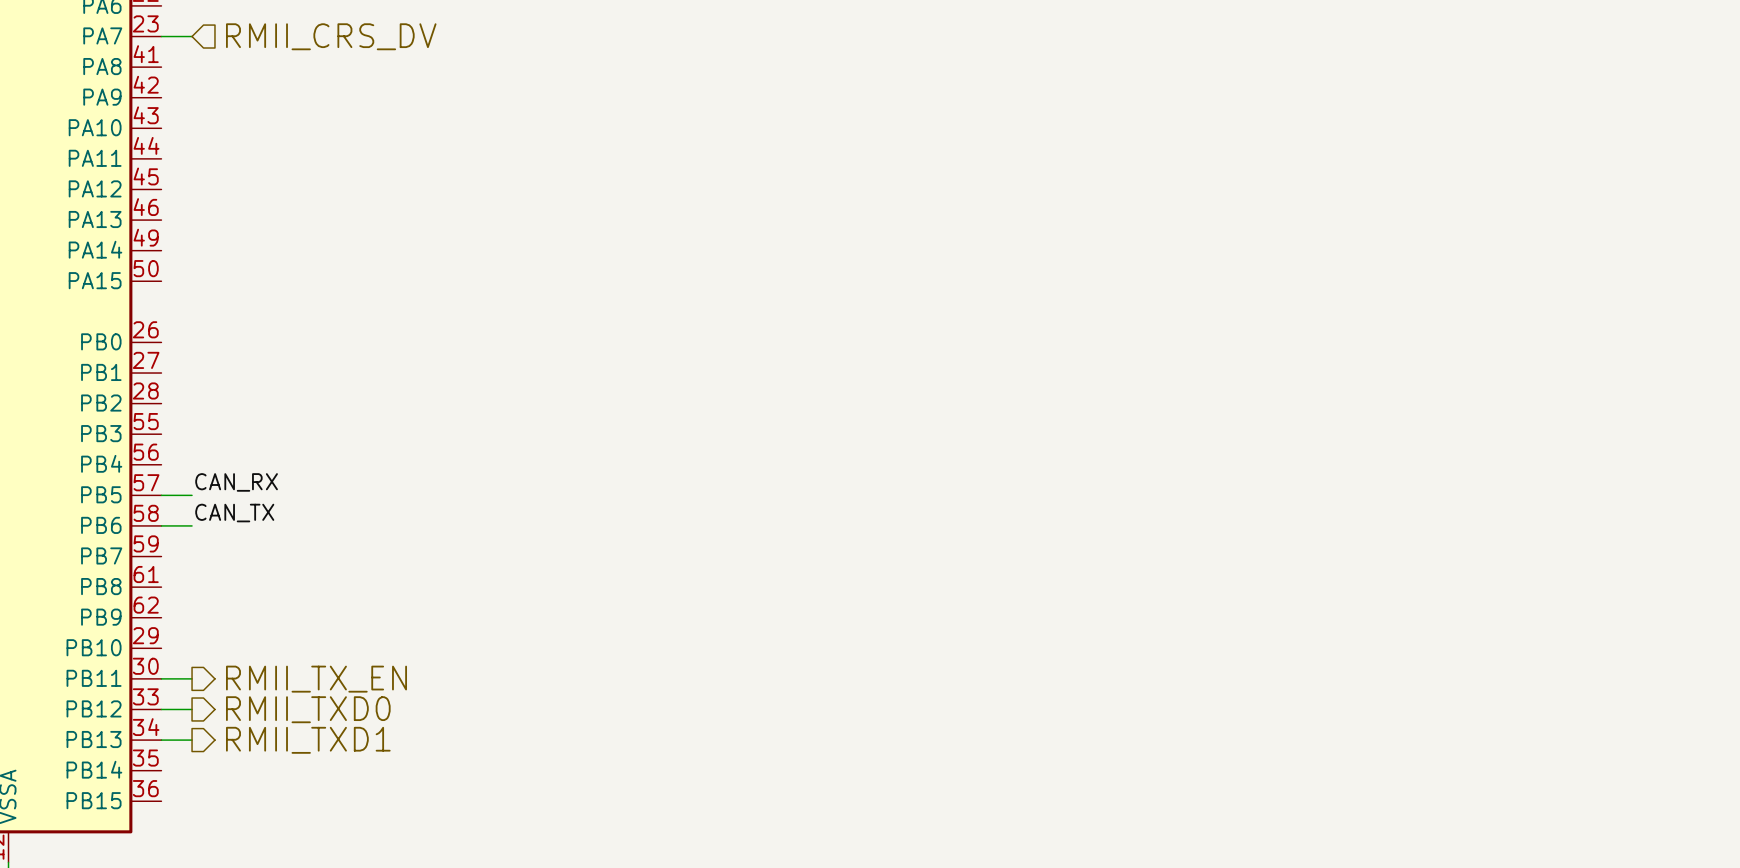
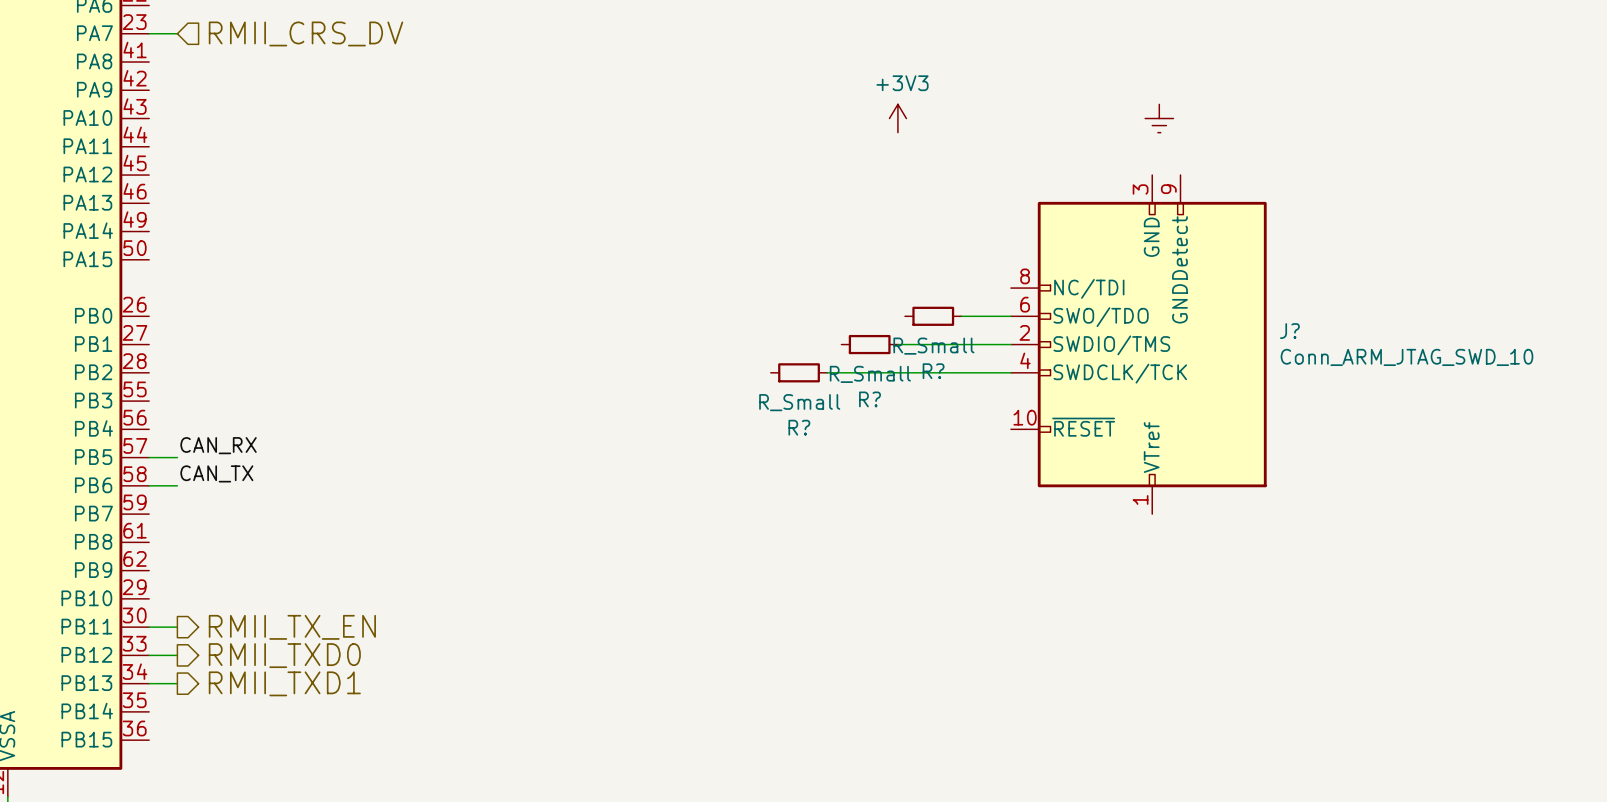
power symbol: none -> +3V3 (897, 118)
power symbol: none -> (1159, 118)
R?: none -> R_Small (933, 316)
wire: none -> (961, 316) (1010, 316)
R?: none -> R_Small (869, 344)
wire: none -> (897, 344) (1010, 344)
J?: none -> Conn_ARM_JTAG_SWD_10 (1138, 344)
R?: none -> R_Small (799, 372)
wire: none -> (827, 372) (1010, 372)

